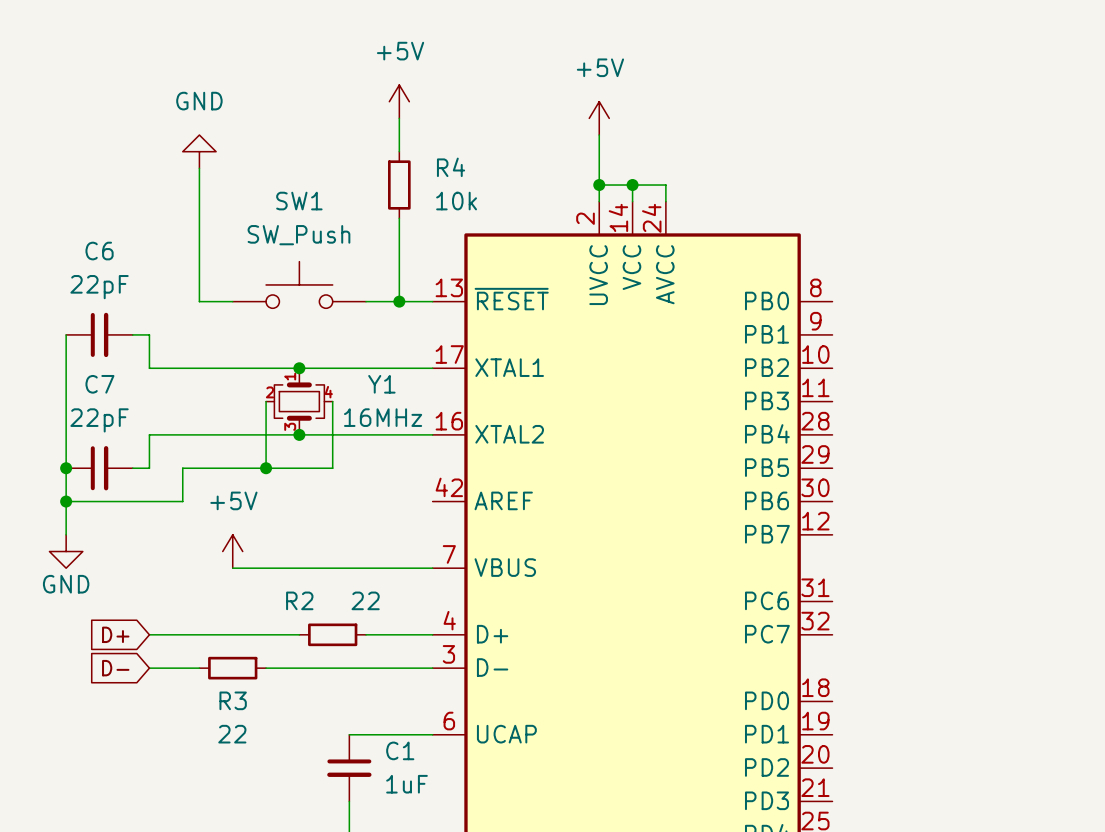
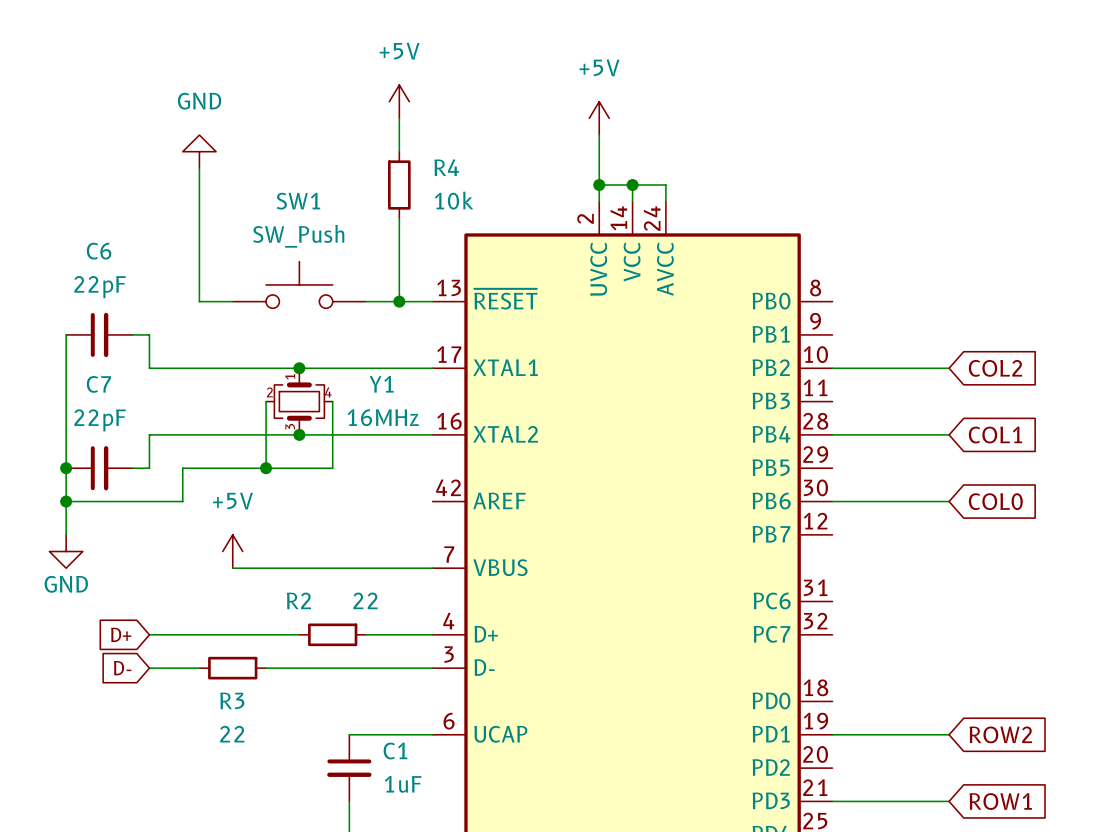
wire: none -> (832, 368) (949, 368)
global label: none -> COL2 (995, 368)
wire: none -> (832, 434) (949, 434)
global label: none -> COL1 (995, 435)
wire: none -> (832, 501) (949, 501)
global label: none -> COL0 (995, 501)
wire: none -> (832, 734) (949, 734)
global label: none -> ROW2 (1000, 734)
wire: none -> (832, 801) (949, 801)
global label: none -> ROW1 (1000, 801)

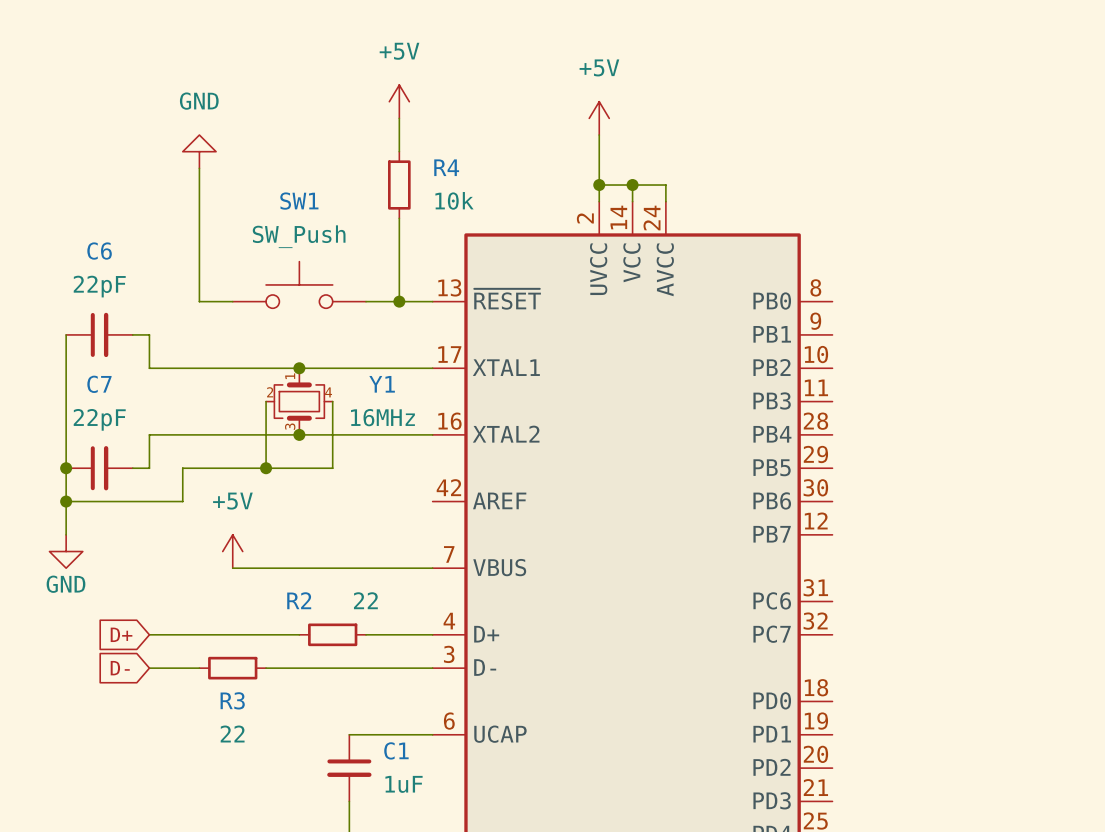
wire: (832, 368) (949, 368) -> none
global label: COL2 (995, 368) -> none
wire: (832, 434) (949, 434) -> none
global label: COL1 (995, 435) -> none
wire: (832, 501) (949, 501) -> none
global label: COL0 (995, 501) -> none
wire: (832, 734) (949, 734) -> none
global label: ROW2 (1000, 734) -> none
wire: (832, 801) (949, 801) -> none
global label: ROW1 (1000, 801) -> none

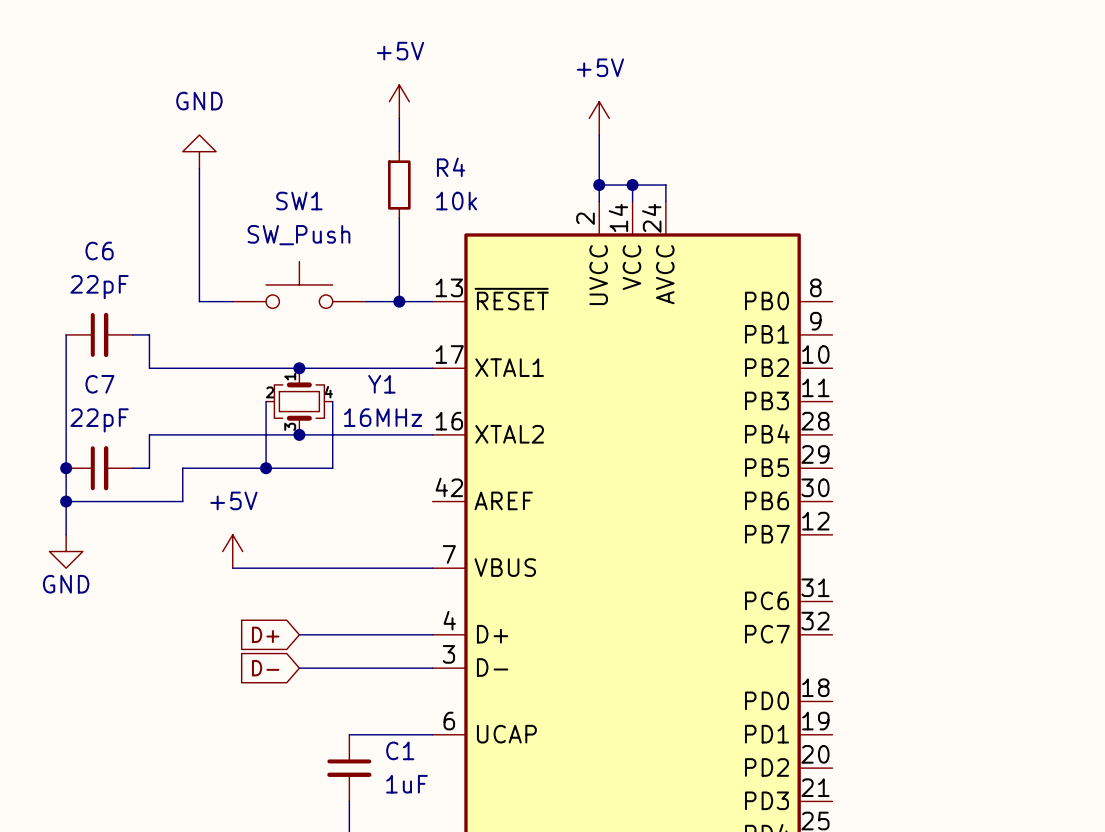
global label position: D+ (121, 634) -> D+ (265, 634)
wire: (149, 634) (299, 634) -> (366, 634) (299, 634)
R2: 22 (332, 634) -> none
global label position: D- (120, 668) -> D- (265, 668)
wire: (149, 668) (199, 668) -> none
R3: 22 (232, 668) -> none
wire: (266, 668) (299, 668) -> none

